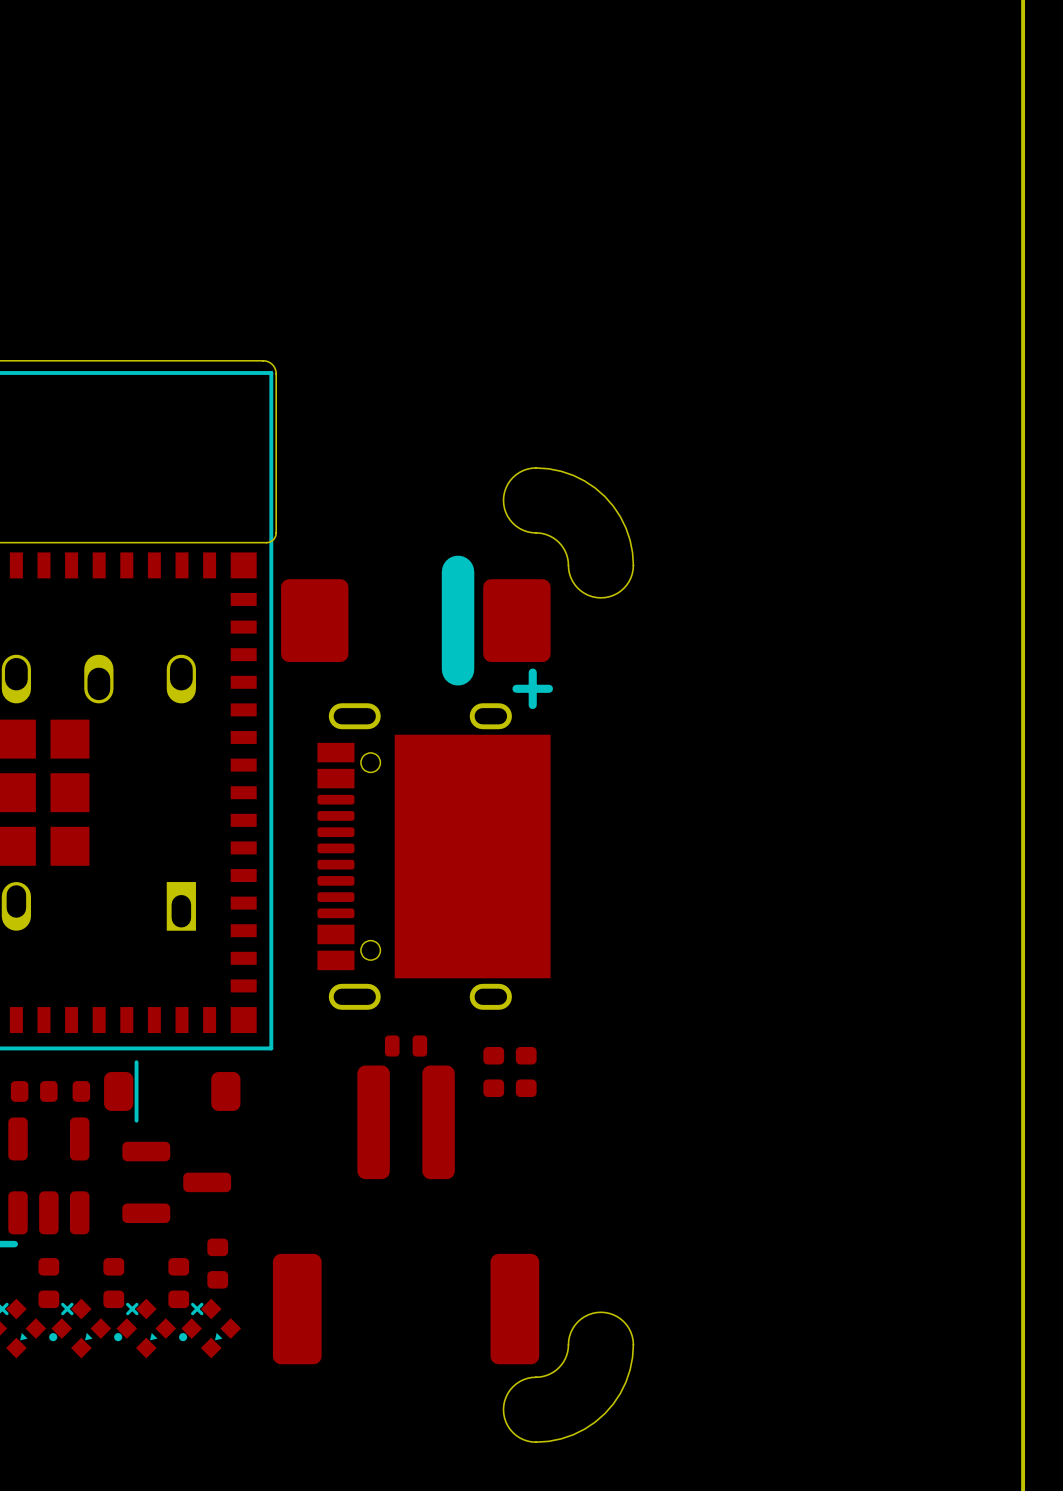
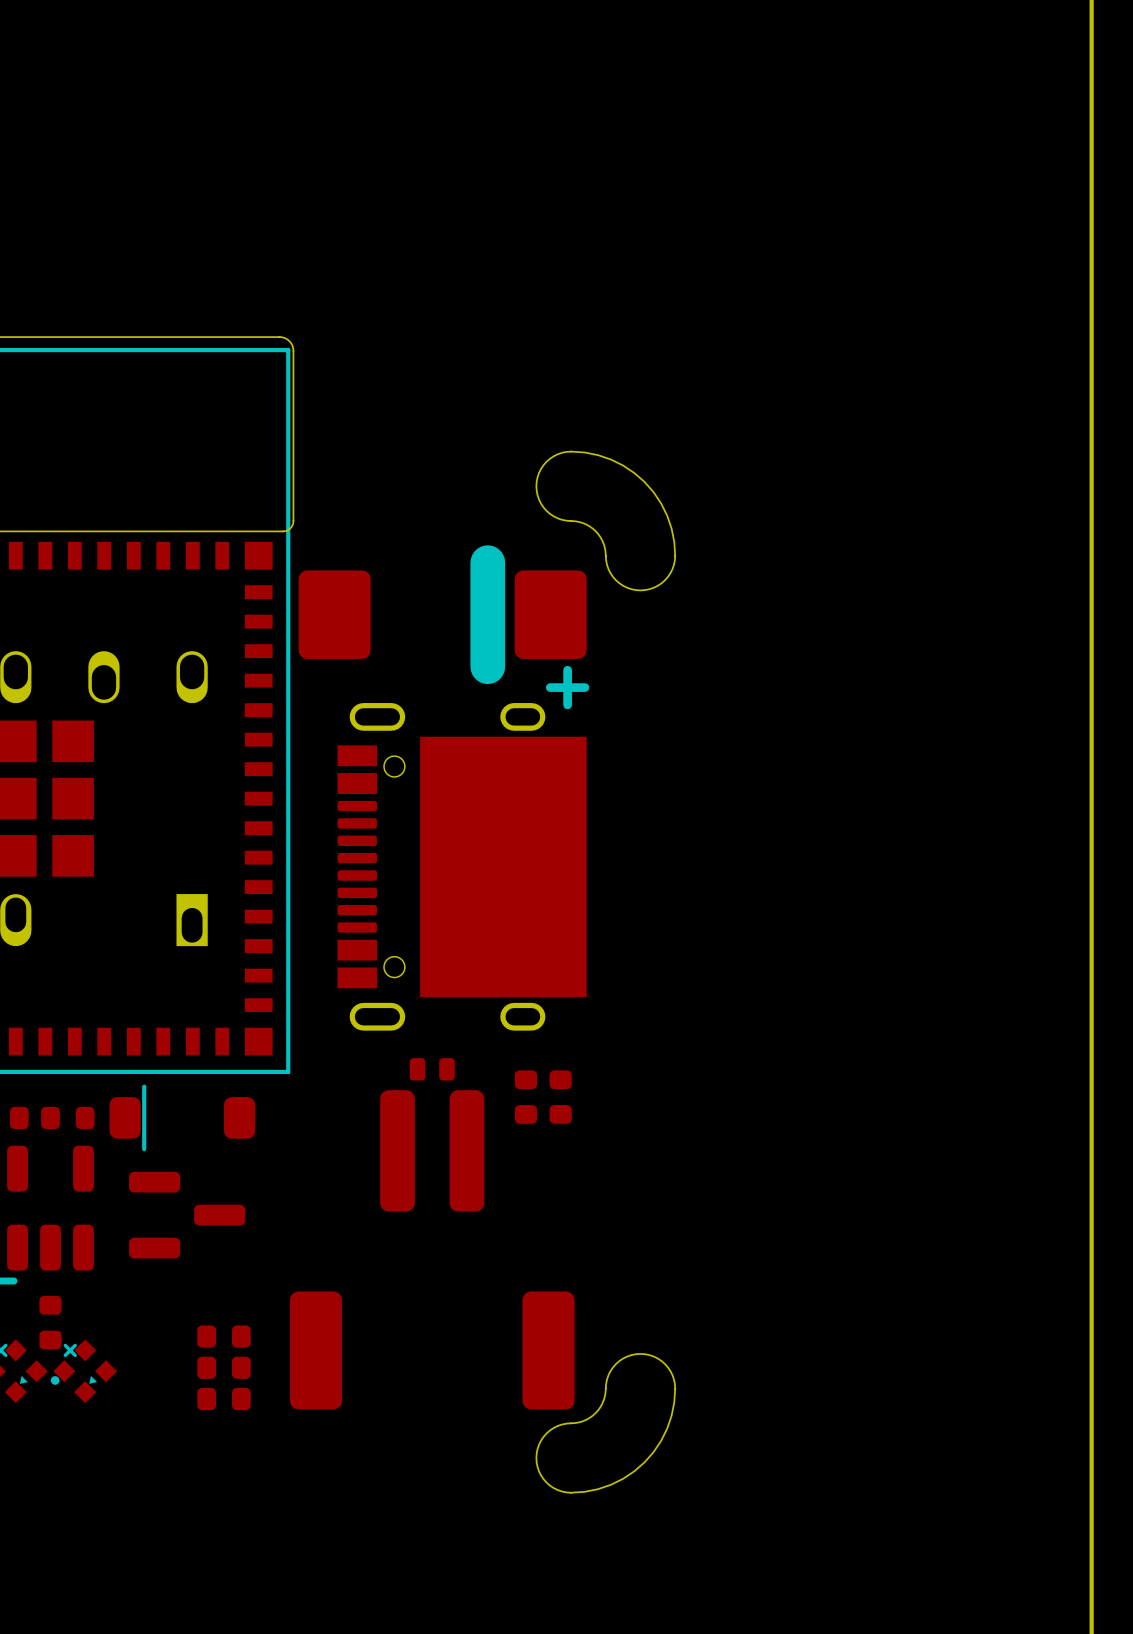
part: (217, 1263) -> none
part: (113, 1283) -> none
part: (178, 1283) -> none
part: none -> (224, 1336)
part footprint: [179, 1298, 242, 1359] -> [197, 1356, 251, 1379]
part: (145, 1328) -> none
part: none -> (224, 1399)

